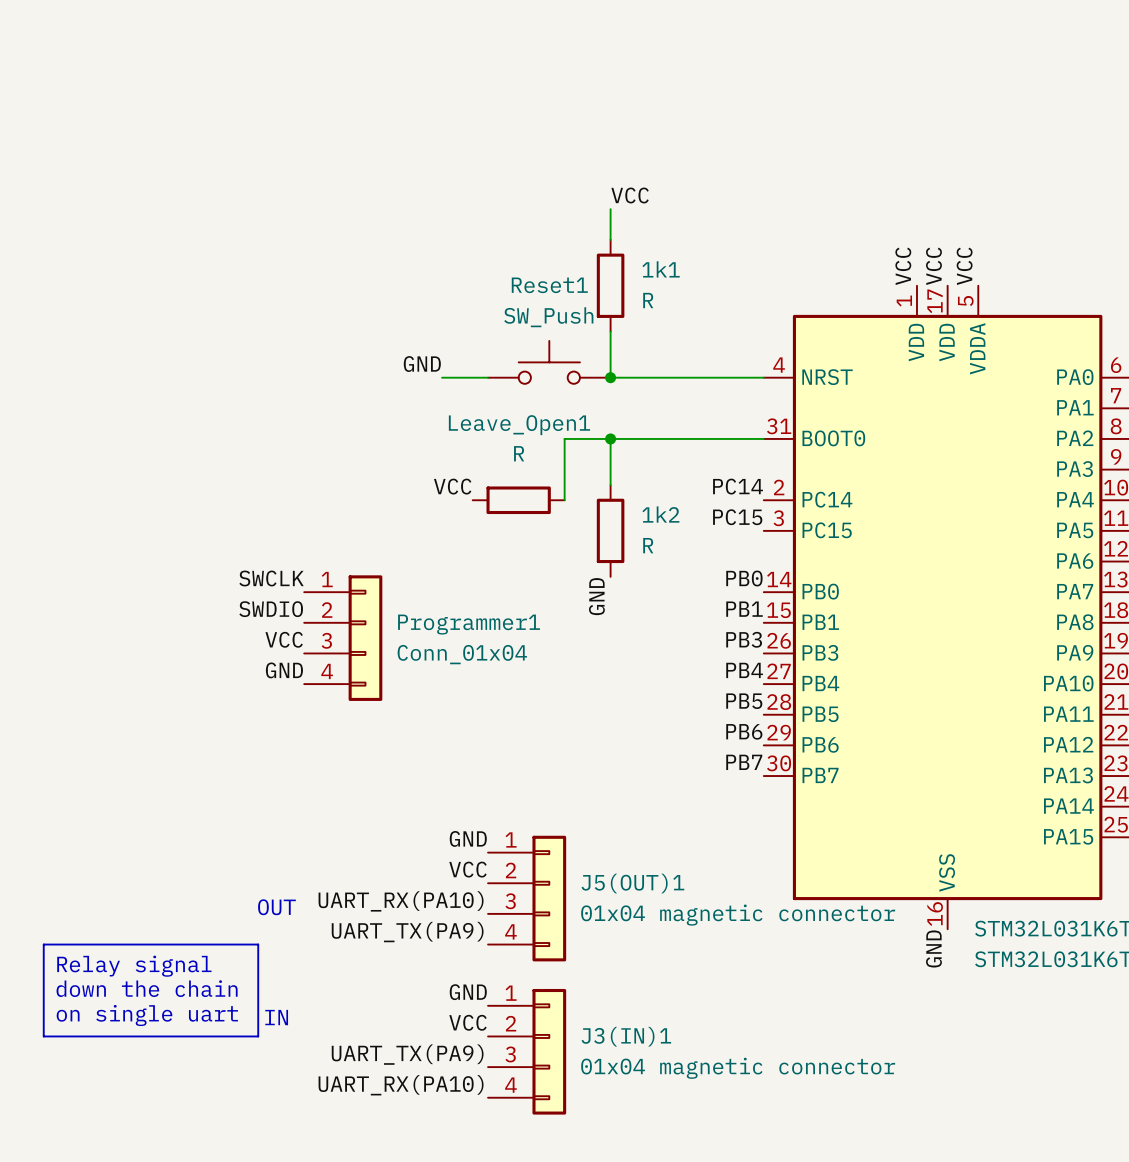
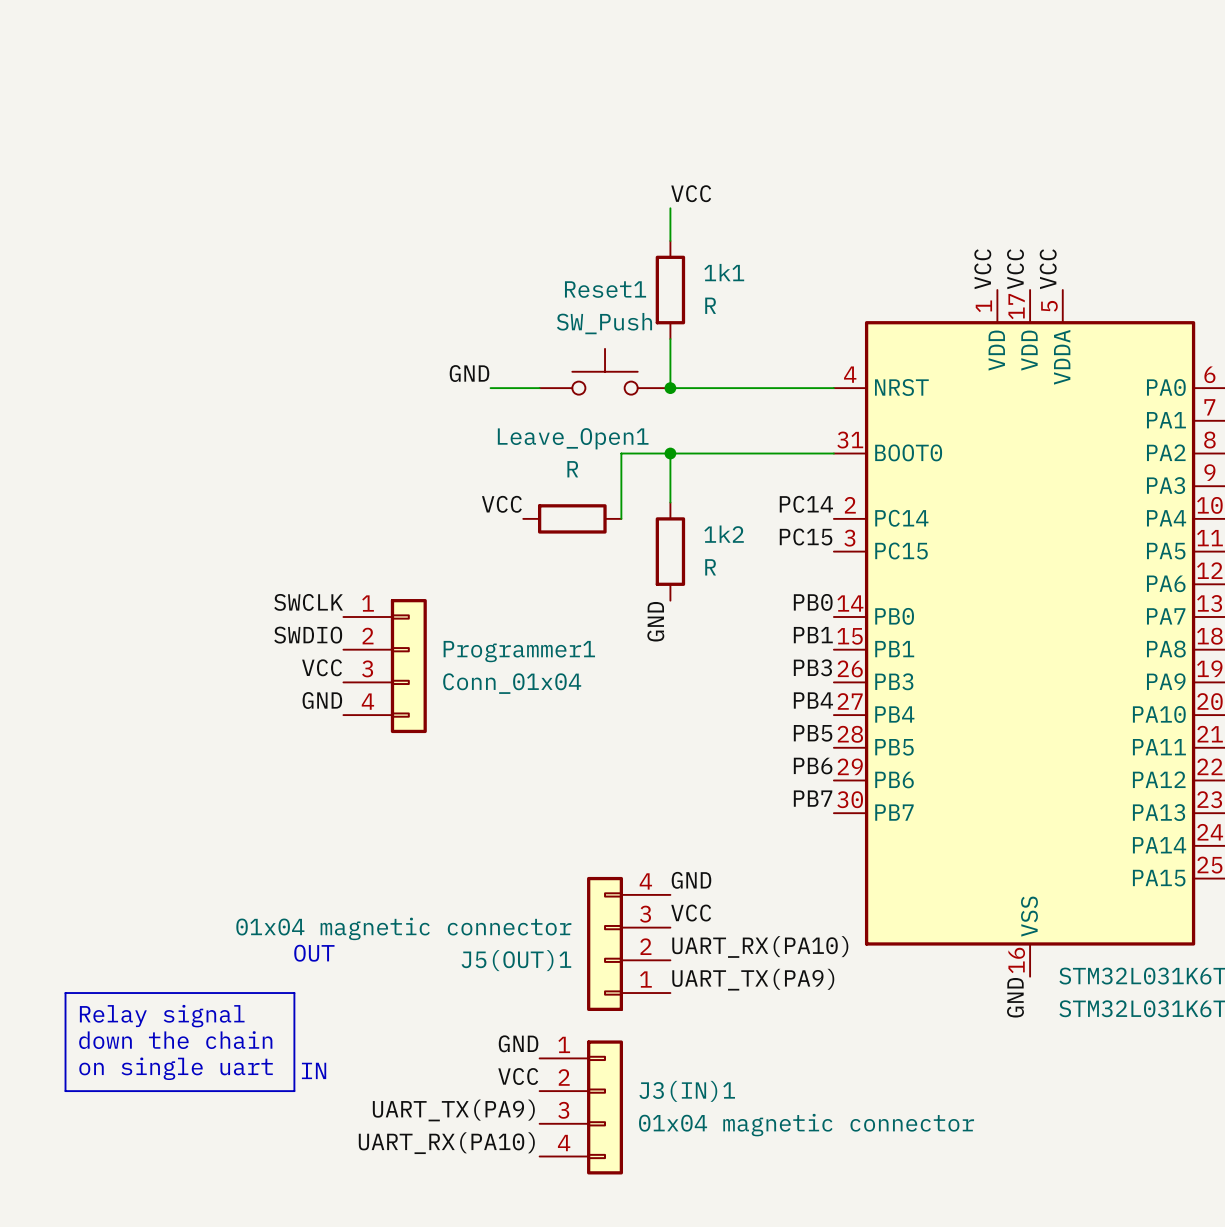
label position: GND (468, 838) -> GND (691, 880)
label position: VCC (467, 869) -> VCC (691, 913)
J5(OUT)1 rotation: 0° (549, 898) -> 180° (605, 943)
label position: UART_RX(PA10) (401, 901) -> UART_RX(PA10) (760, 946)
label position: UART_TX(PA9) (407, 932) -> UART_TX(PA9) (753, 979)

